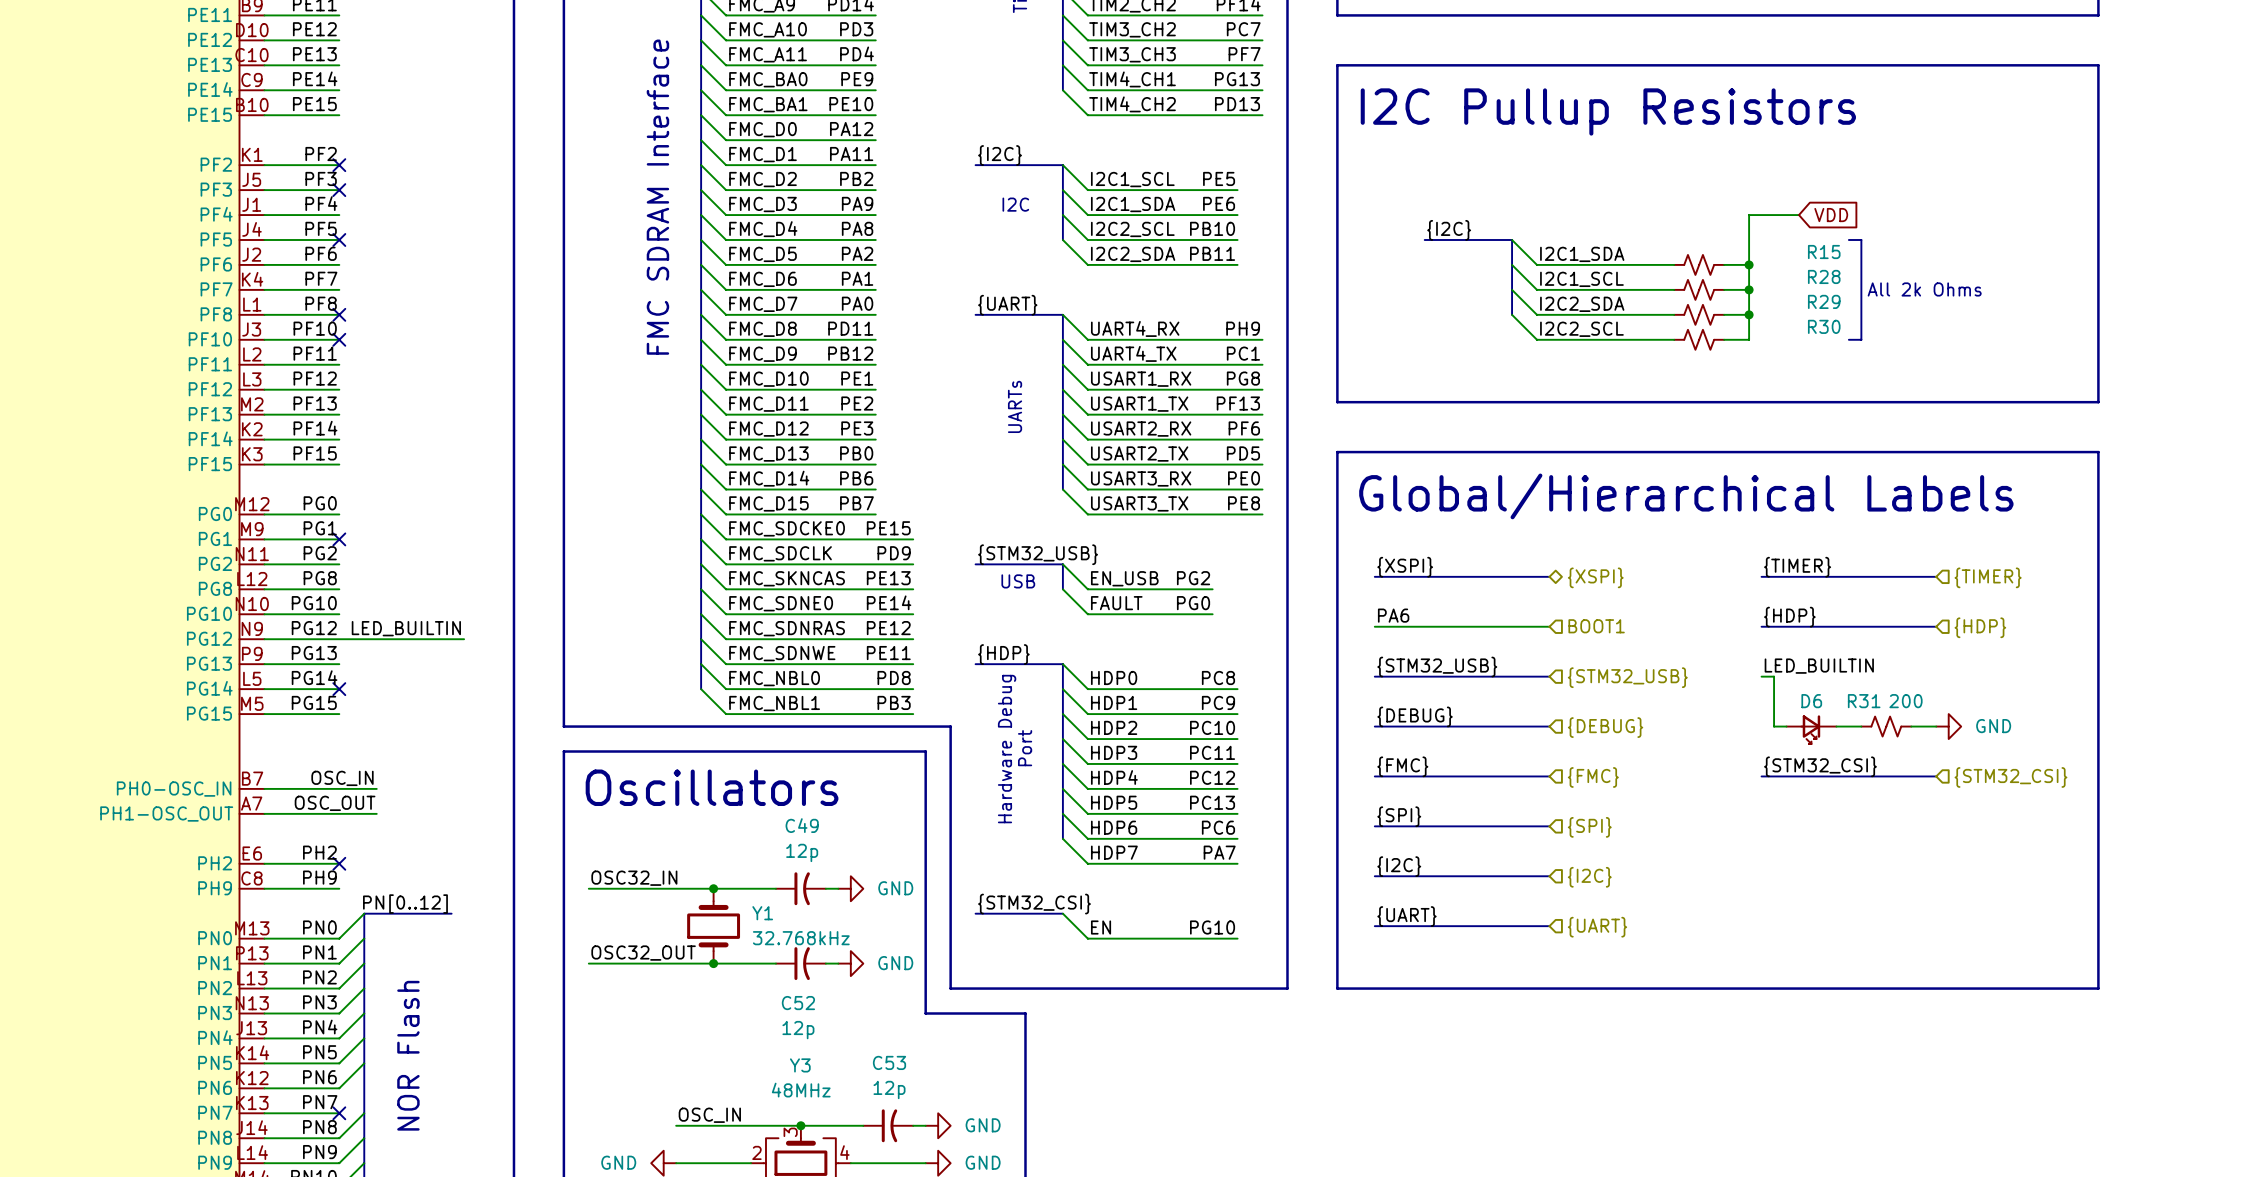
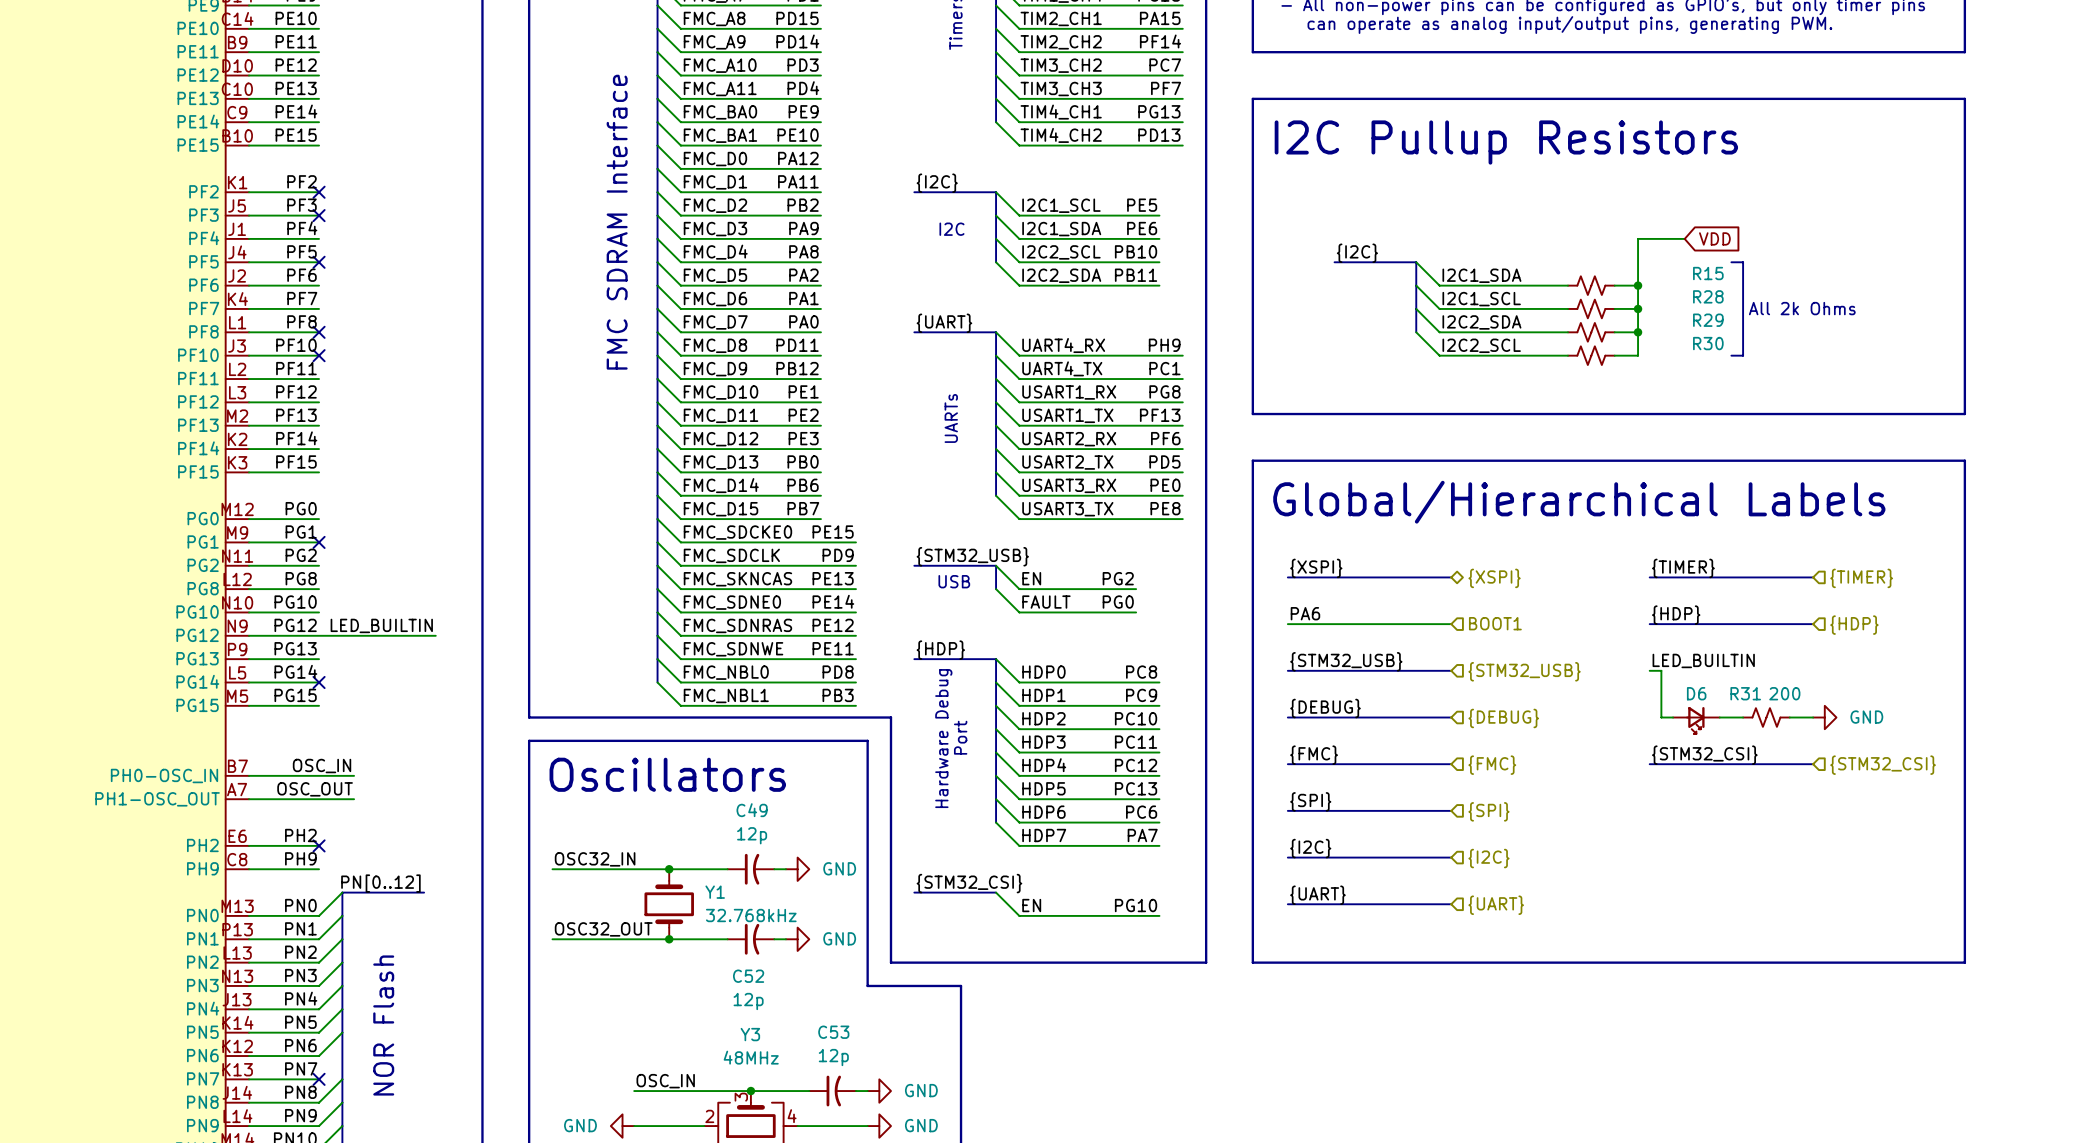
label: EN_USB (1124, 578) -> EN (1031, 578)

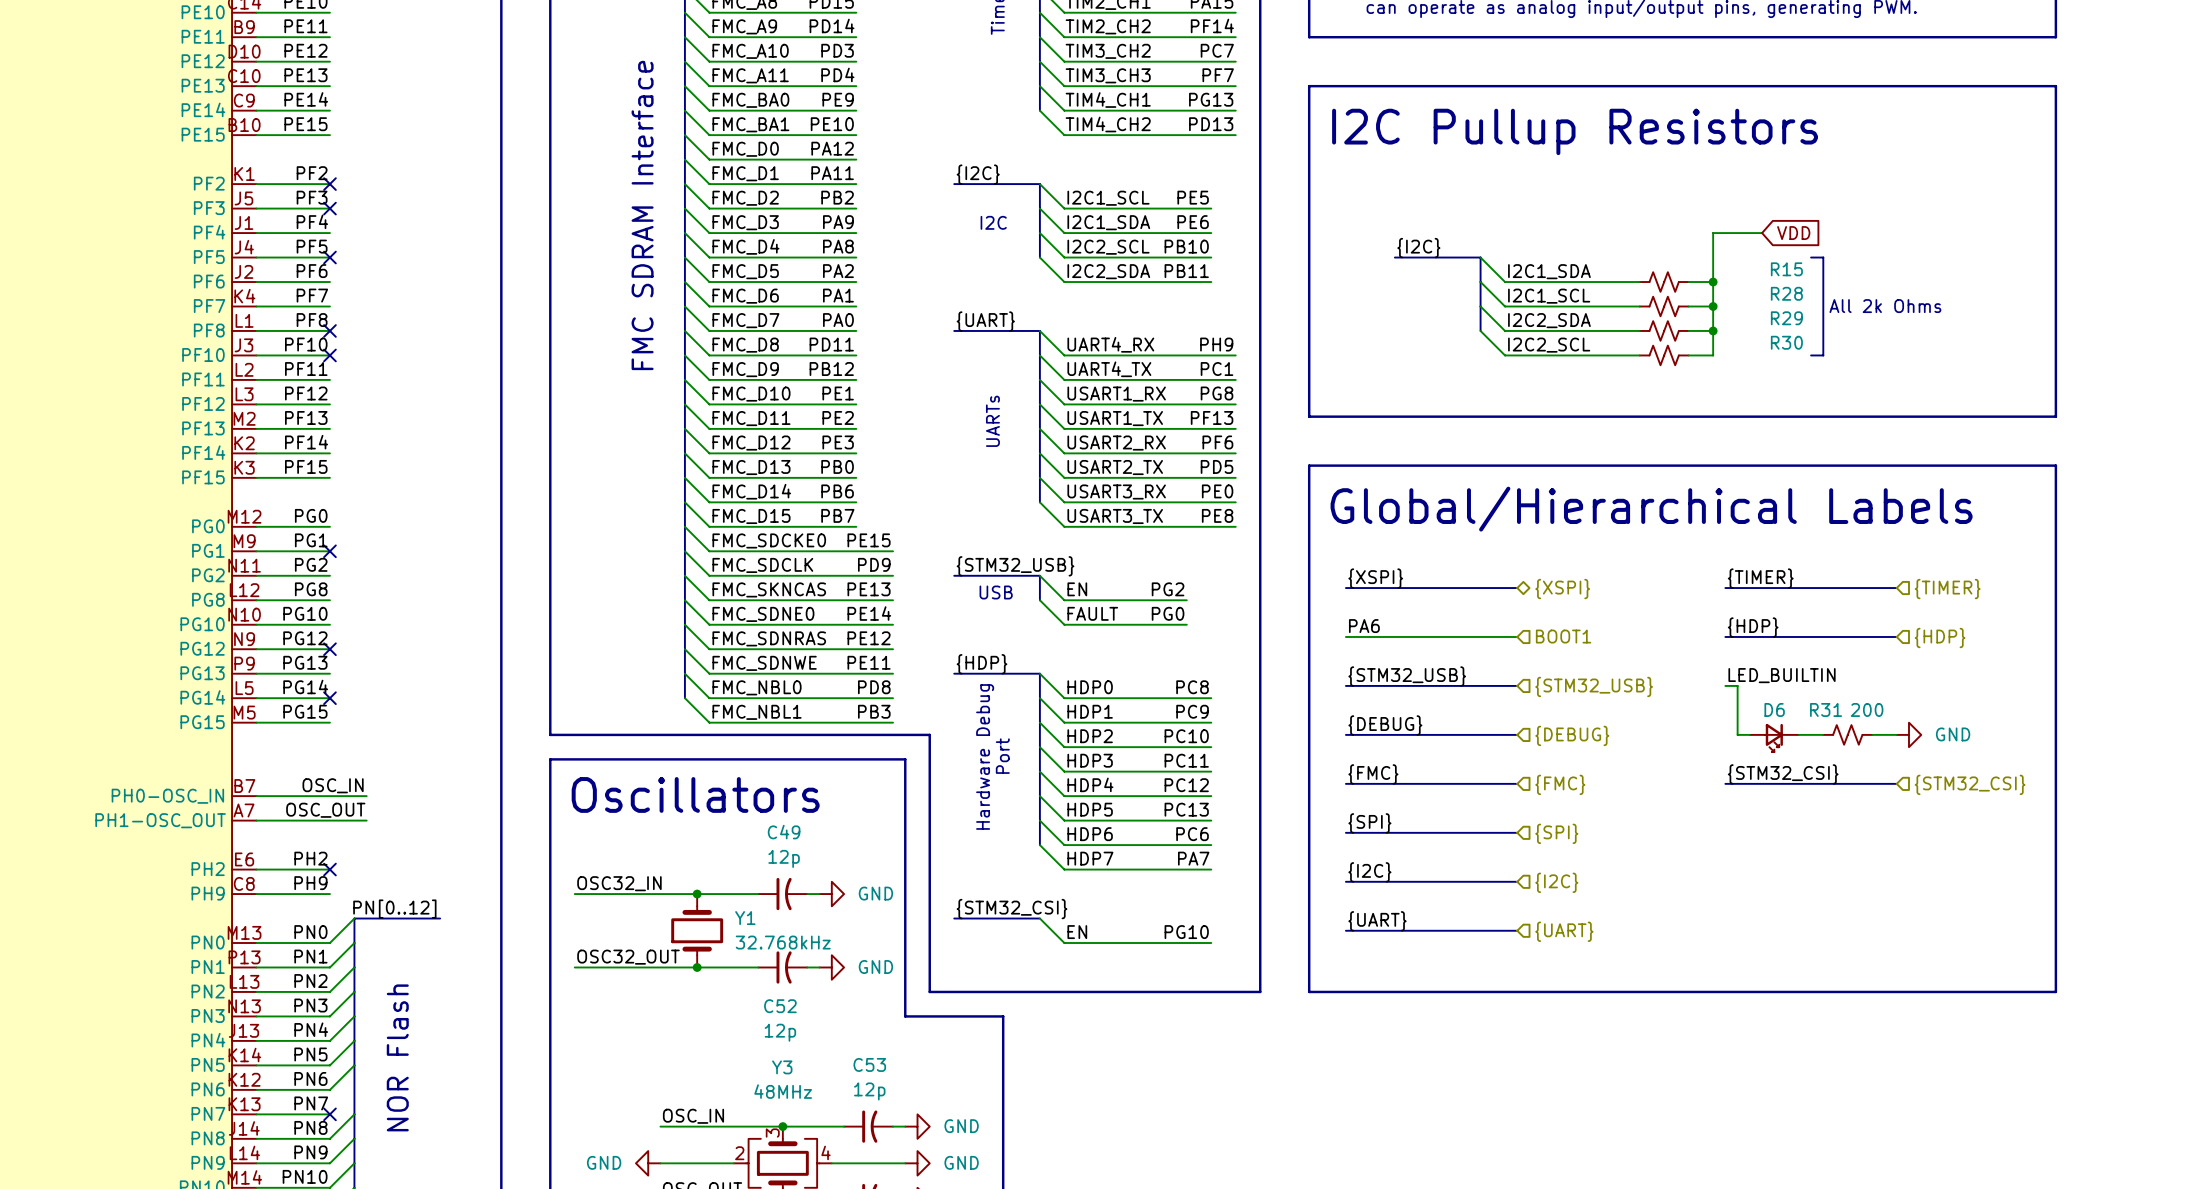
label: LED_BUILTIN (381, 625) -> none
wire: (319, 635) (435, 635) -> none
no-connect mark: none -> (329, 649)

